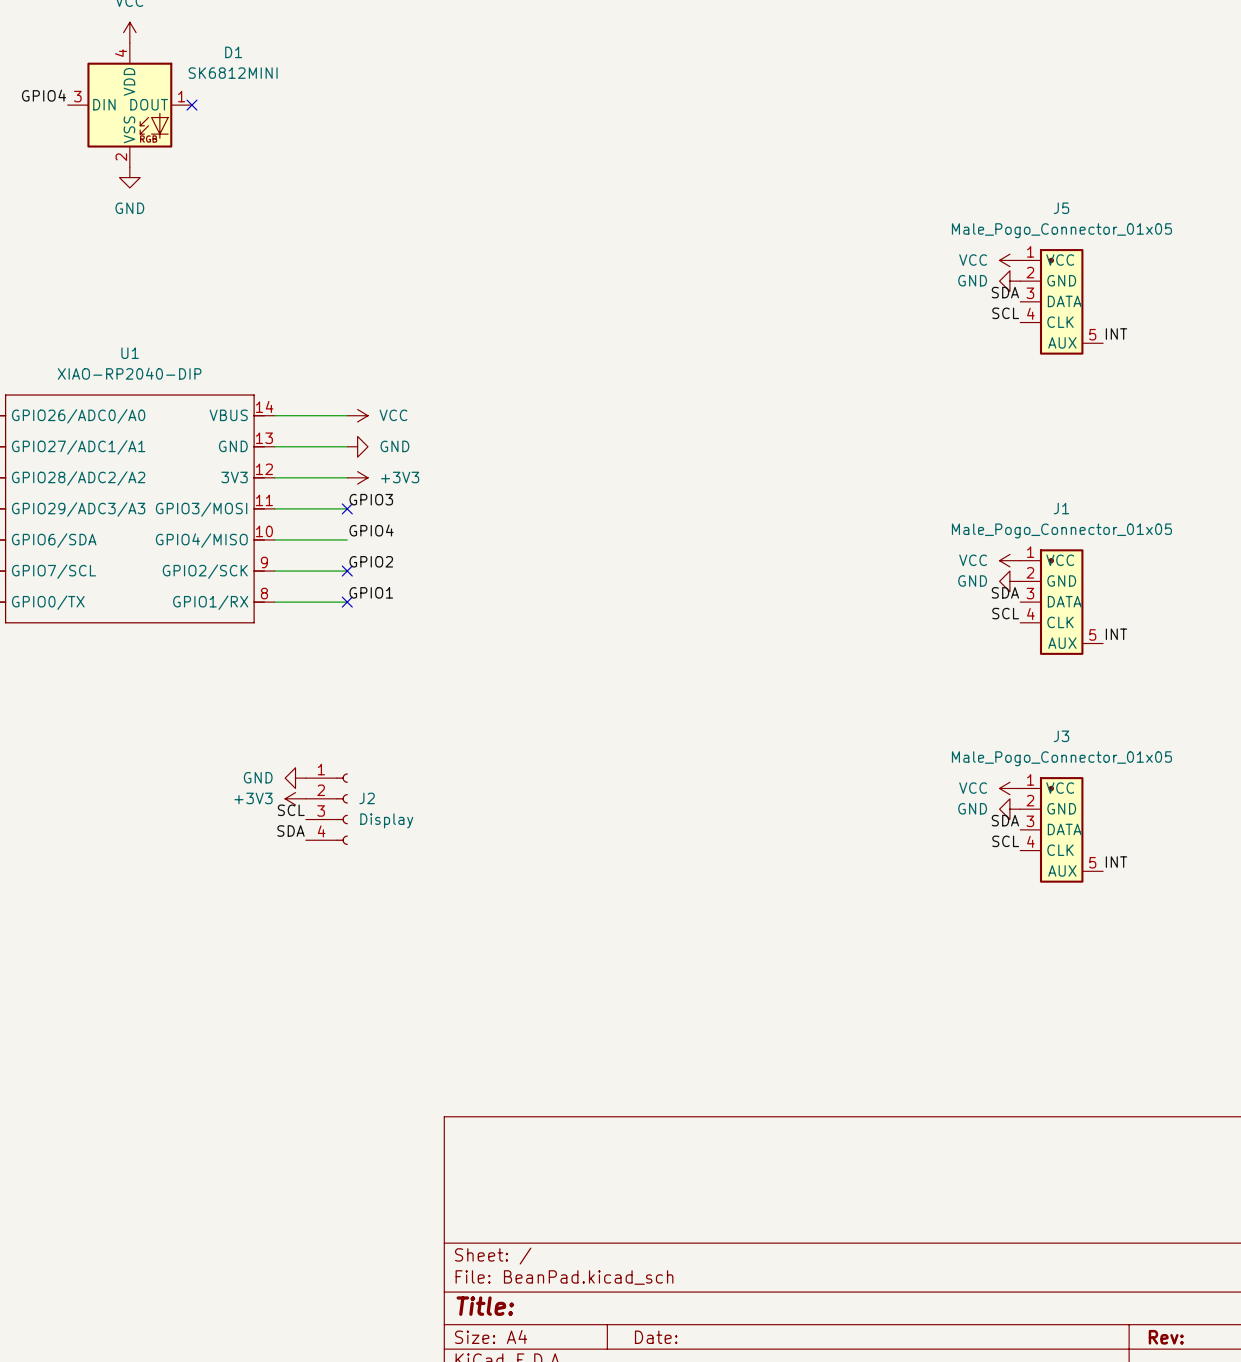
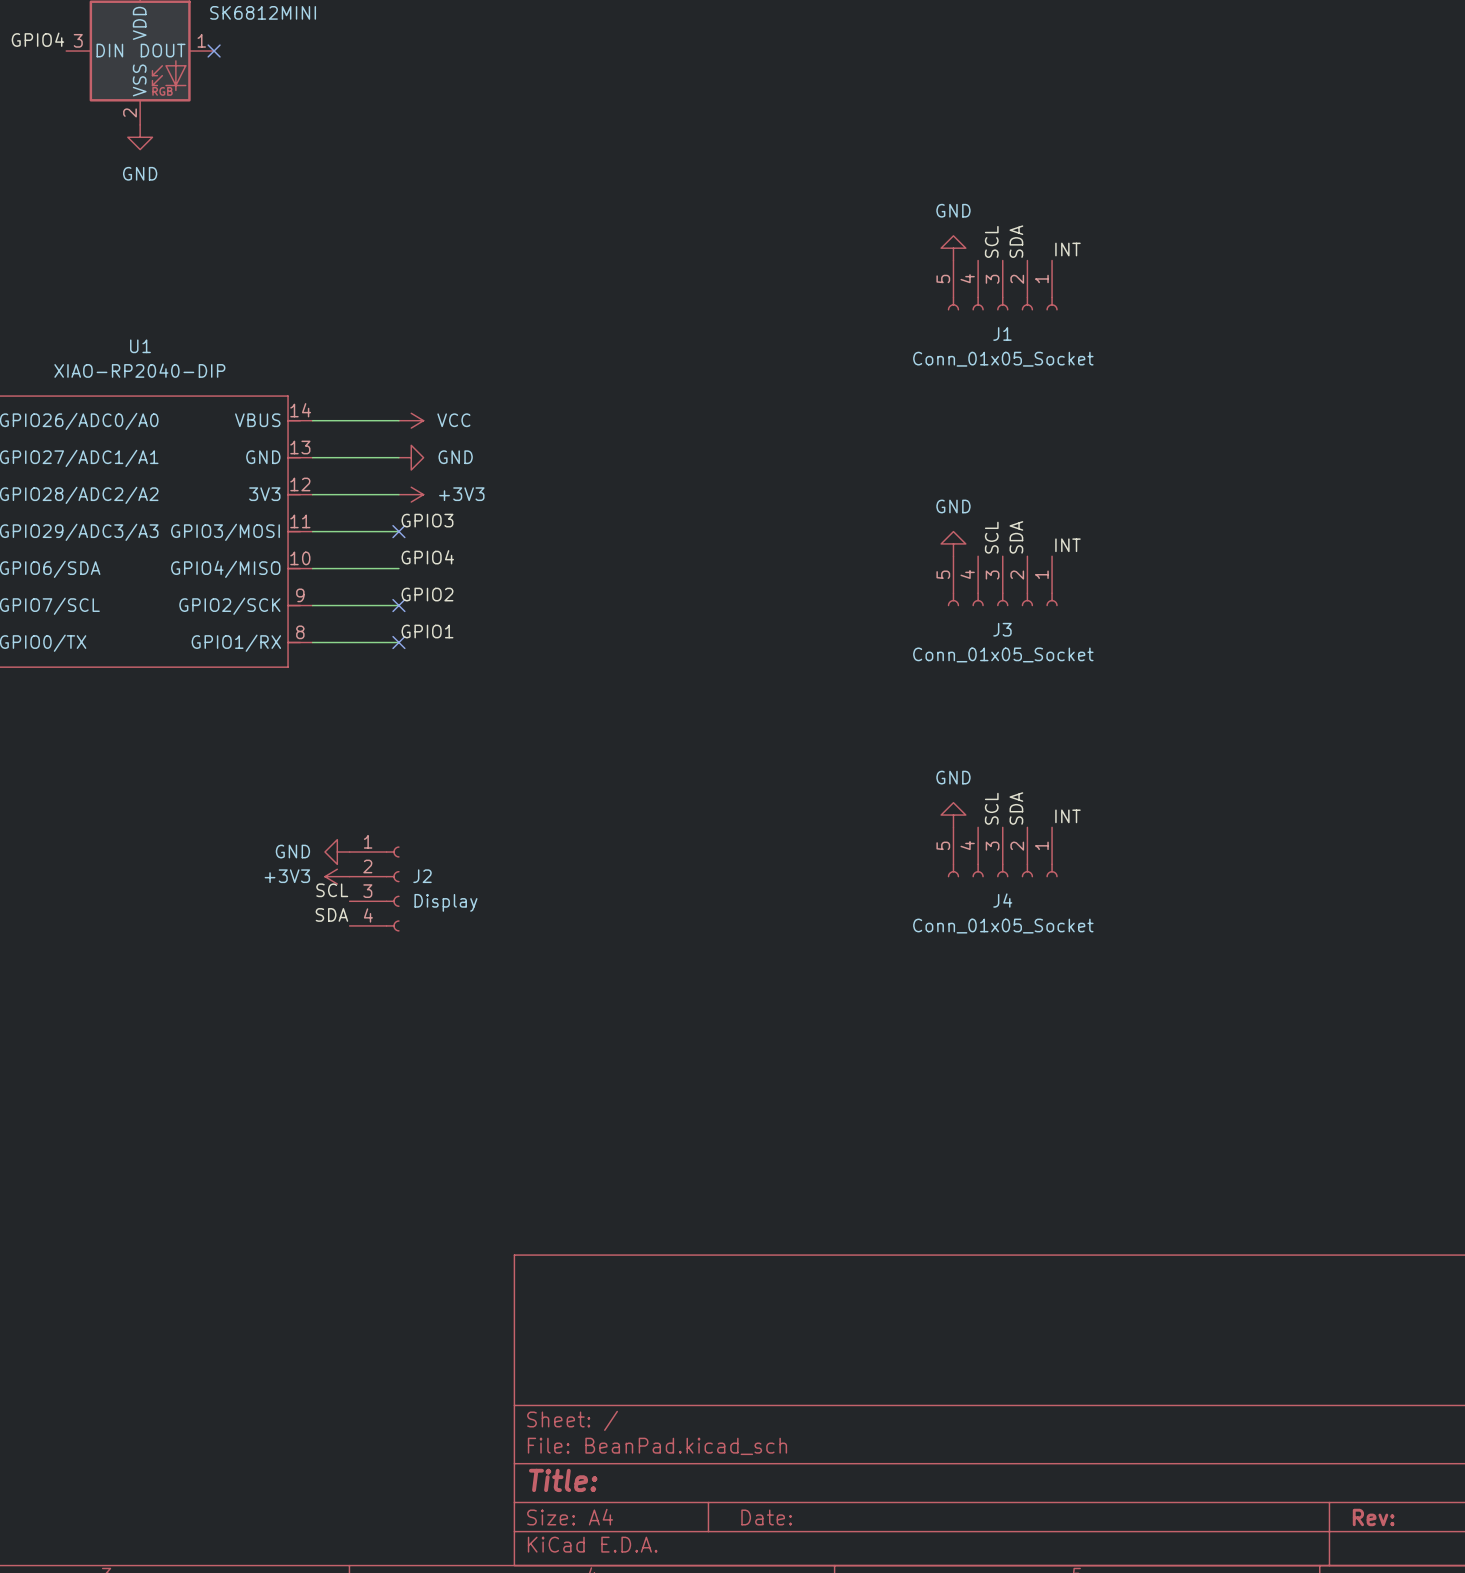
power symbol: VCC (1009, 260) -> none
label: none -> SCL (991, 241)
label: none -> SDA (1016, 241)
power symbol: none -> GND (953, 248)
label: none -> INT (1067, 249)
power symbol: GND (1009, 281) -> none
label: SDA (1005, 292) -> none
J5: Male_Pogo_Connector_01x05 (1061, 301) -> none
label: SCL (1005, 313) -> none
label: INT (1116, 334) -> none
J1 name position: J1 (1061, 508) -> J1 (1002, 333)
label: none -> SDA (1016, 537)
label: none -> SCL (991, 537)
power symbol: none -> GND (953, 543)
label: none -> INT (1067, 545)
J1 value: Male_Pogo_Connector_01x05 (1061, 530) -> Conn_01x05_Socket (1003, 359)
J1 symbol: [1020, 549, 1104, 655] -> [947, 260, 1058, 311]
power symbol: VCC (1009, 560) -> none
power symbol: GND (1009, 581) -> none
label: SDA (1005, 592) -> none
label: SCL (1005, 613) -> none
label: INT (1116, 634) -> none
J3 name position: J3 (1061, 736) -> J3 (1002, 629)
label: none -> SCL (991, 808)
label: none -> SDA (1016, 808)
power symbol: none -> GND (953, 815)
label: none -> INT (1067, 816)
J3 value: Male_Pogo_Connector_01x05 (1061, 758) -> Conn_01x05_Socket (1003, 654)
J3 symbol: [1020, 777, 1104, 883] -> [947, 556, 1058, 607]
J4: none -> Conn_01x05_Socket (1002, 852)
power symbol: VCC (1009, 788) -> none
power symbol: GND (1009, 809) -> none
label: SDA (1005, 820) -> none
label: SCL (1005, 841) -> none
label: INT (1116, 862) -> none

